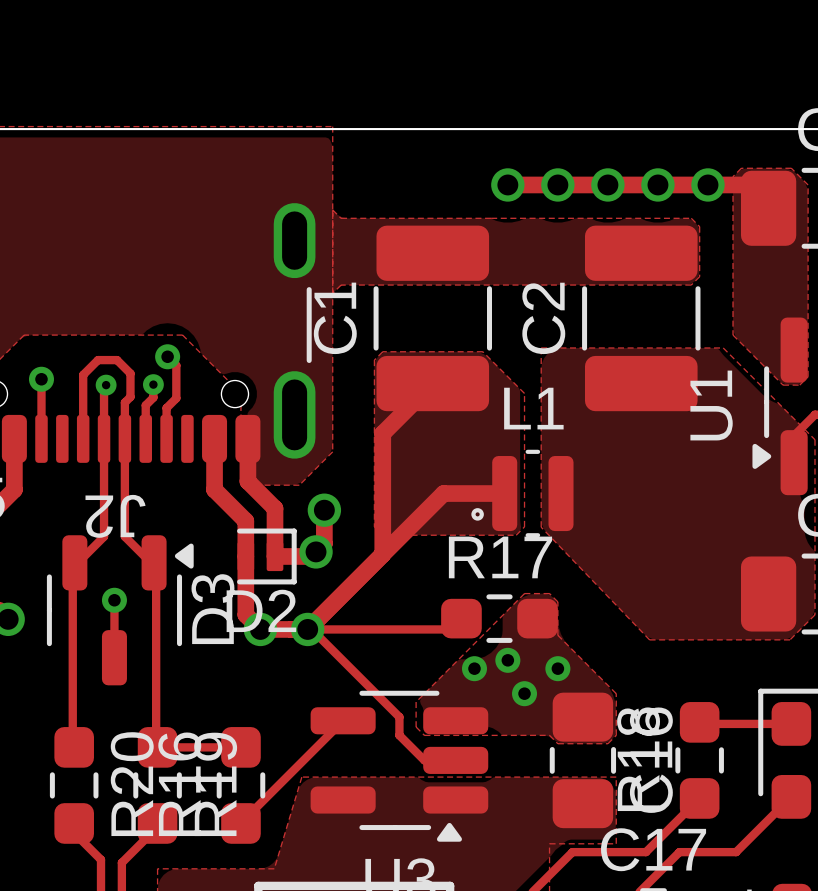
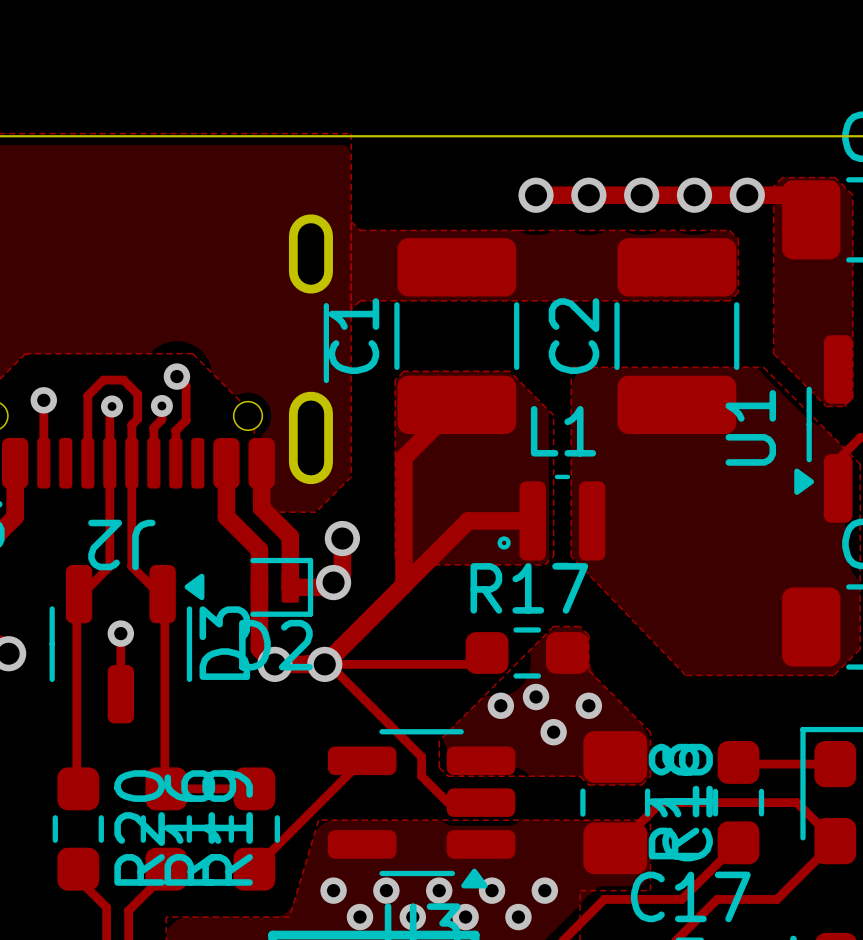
track: none -> (835, 841) (796, 802) (660, 802) (615, 848)
via: none -> (333, 890)
via: none -> (386, 890)
via: none -> (439, 890)
via: none -> (492, 890)
via: none -> (544, 890)
via: none -> (359, 917)
via: none -> (412, 917)
via: none -> (465, 917)
via: none -> (518, 917)

